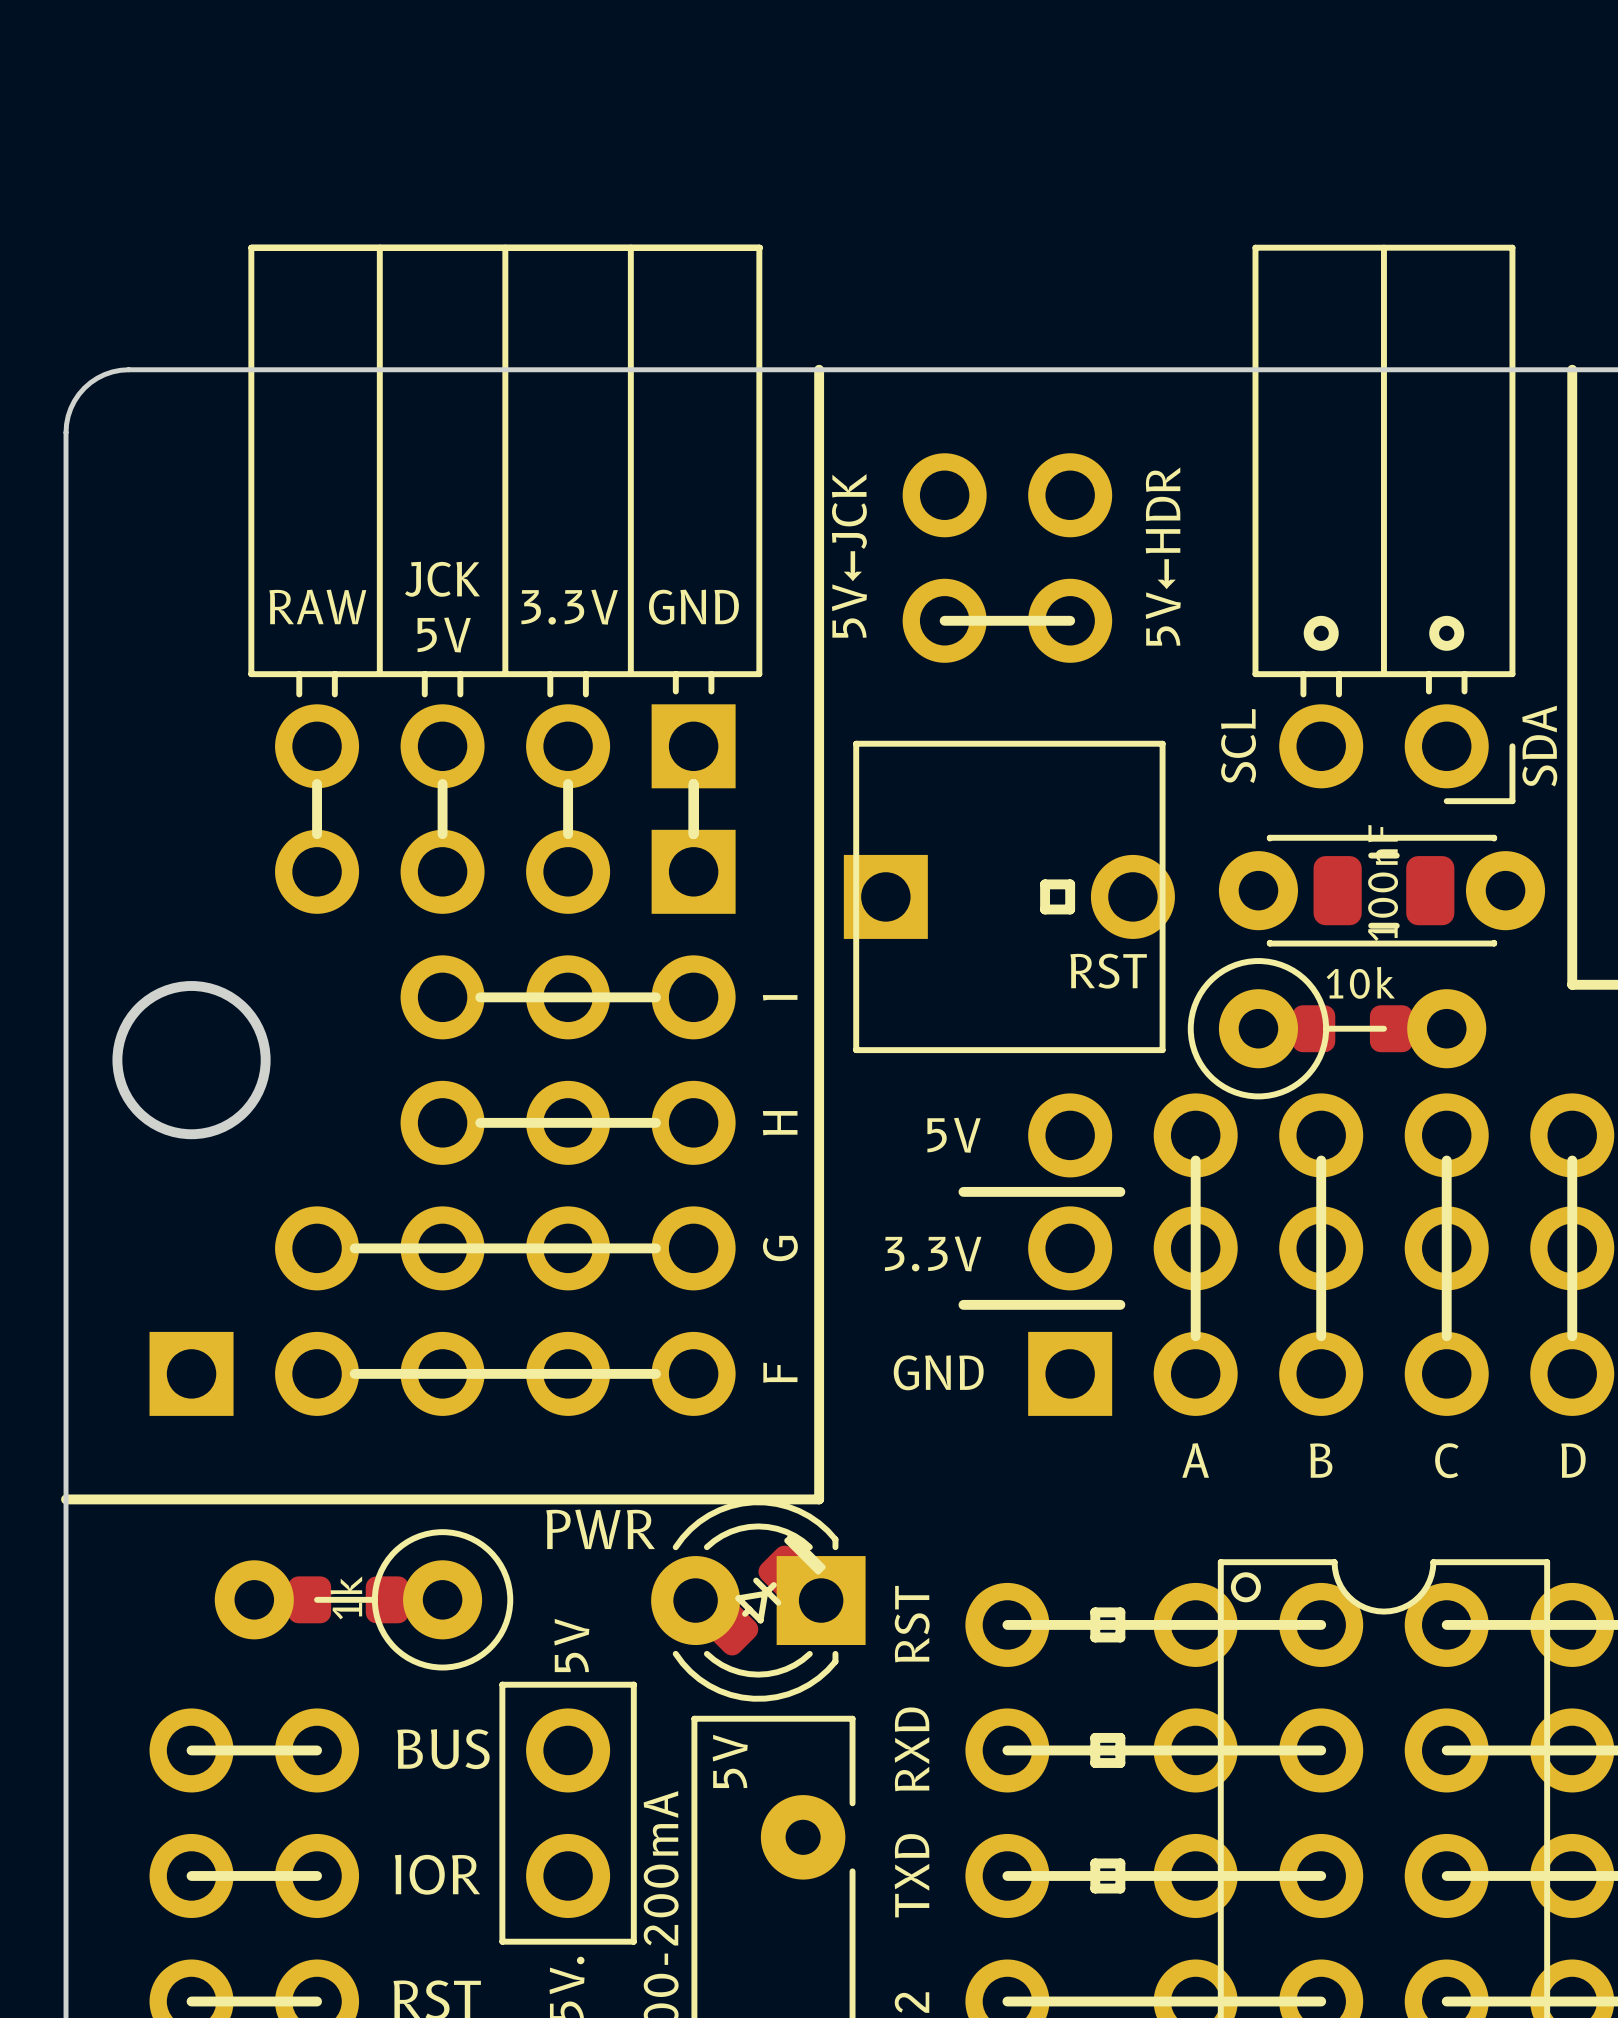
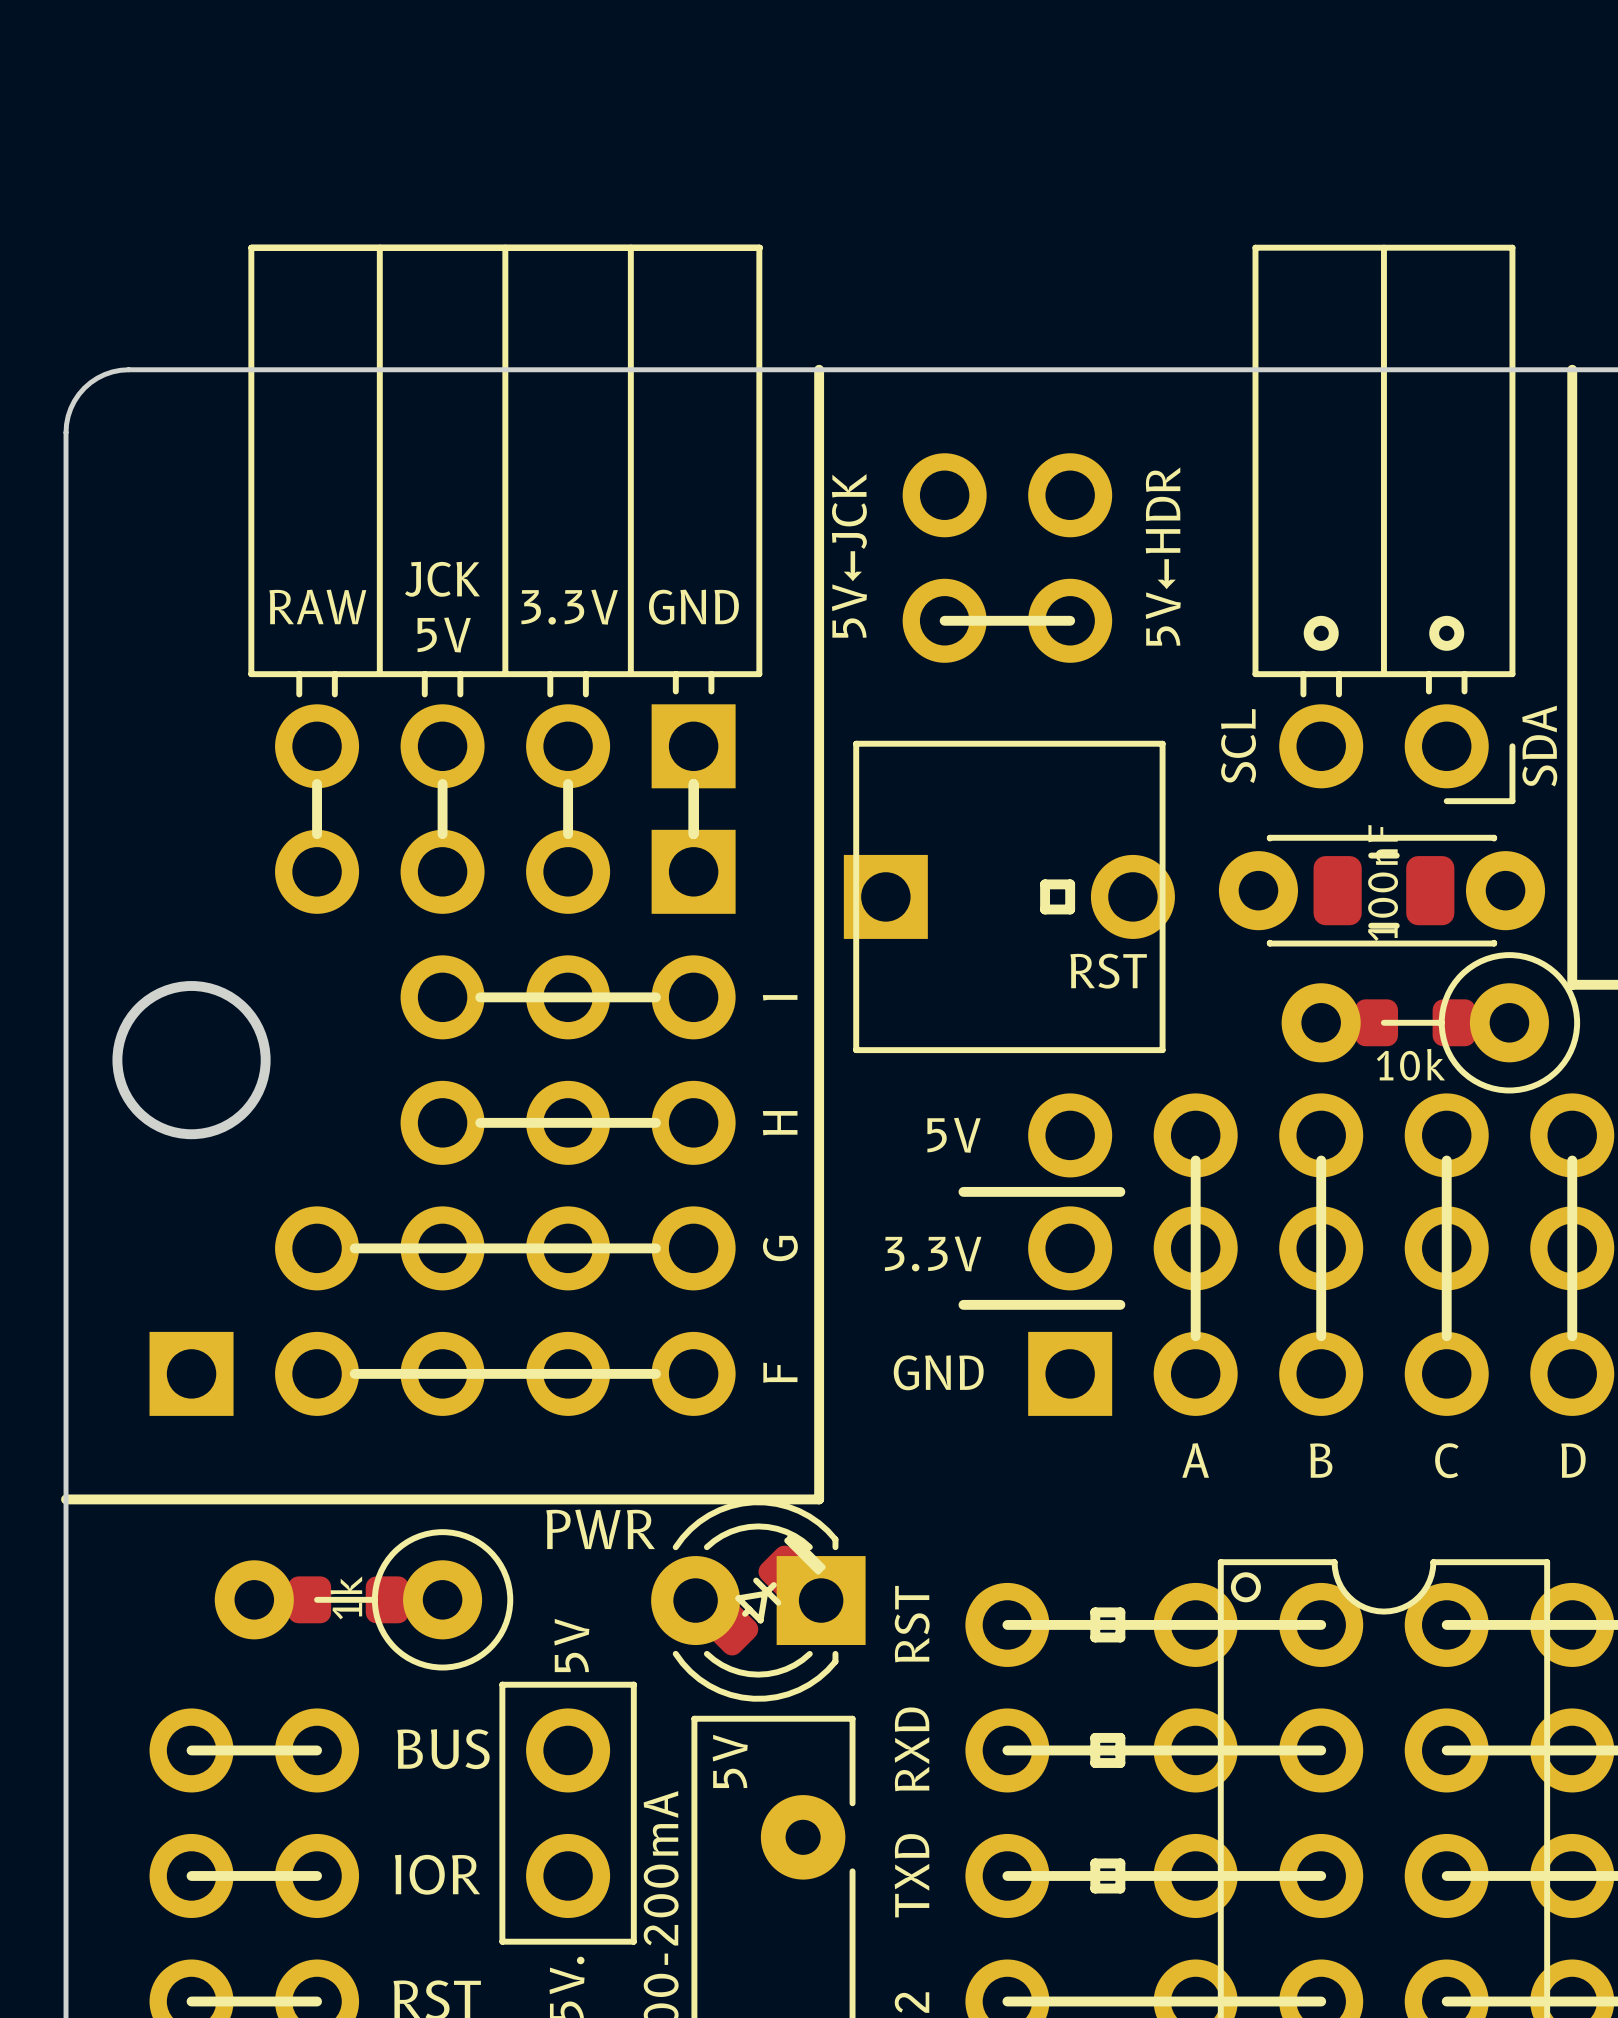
part value position: 10k (1360, 982) -> 10k (1410, 1064)
part rotation: 0° (1337, 1028) -> 180° (1430, 1022)
part position: (1352, 1028) -> (1415, 1022)

